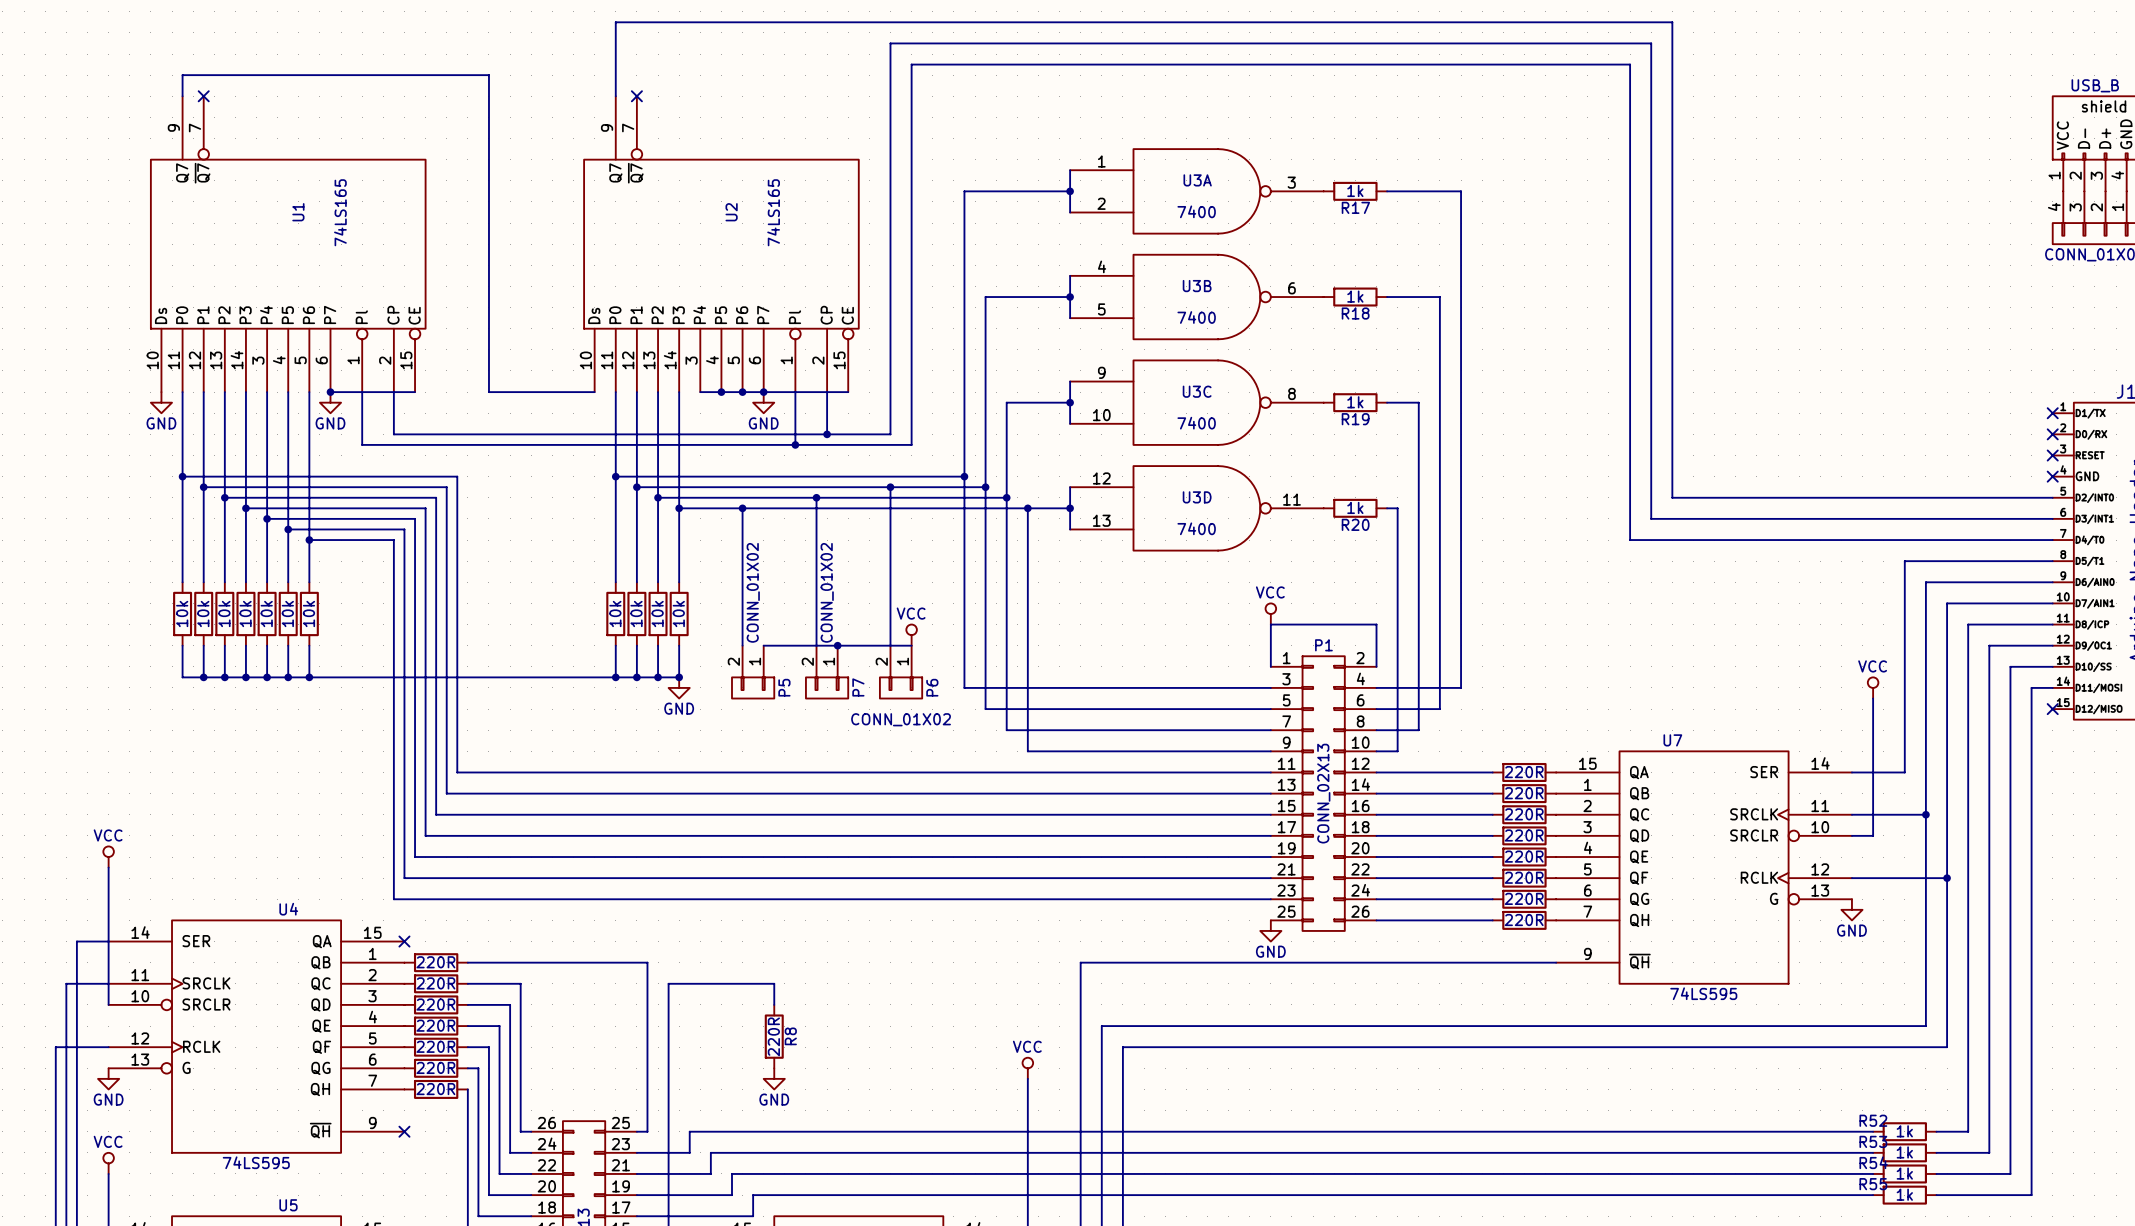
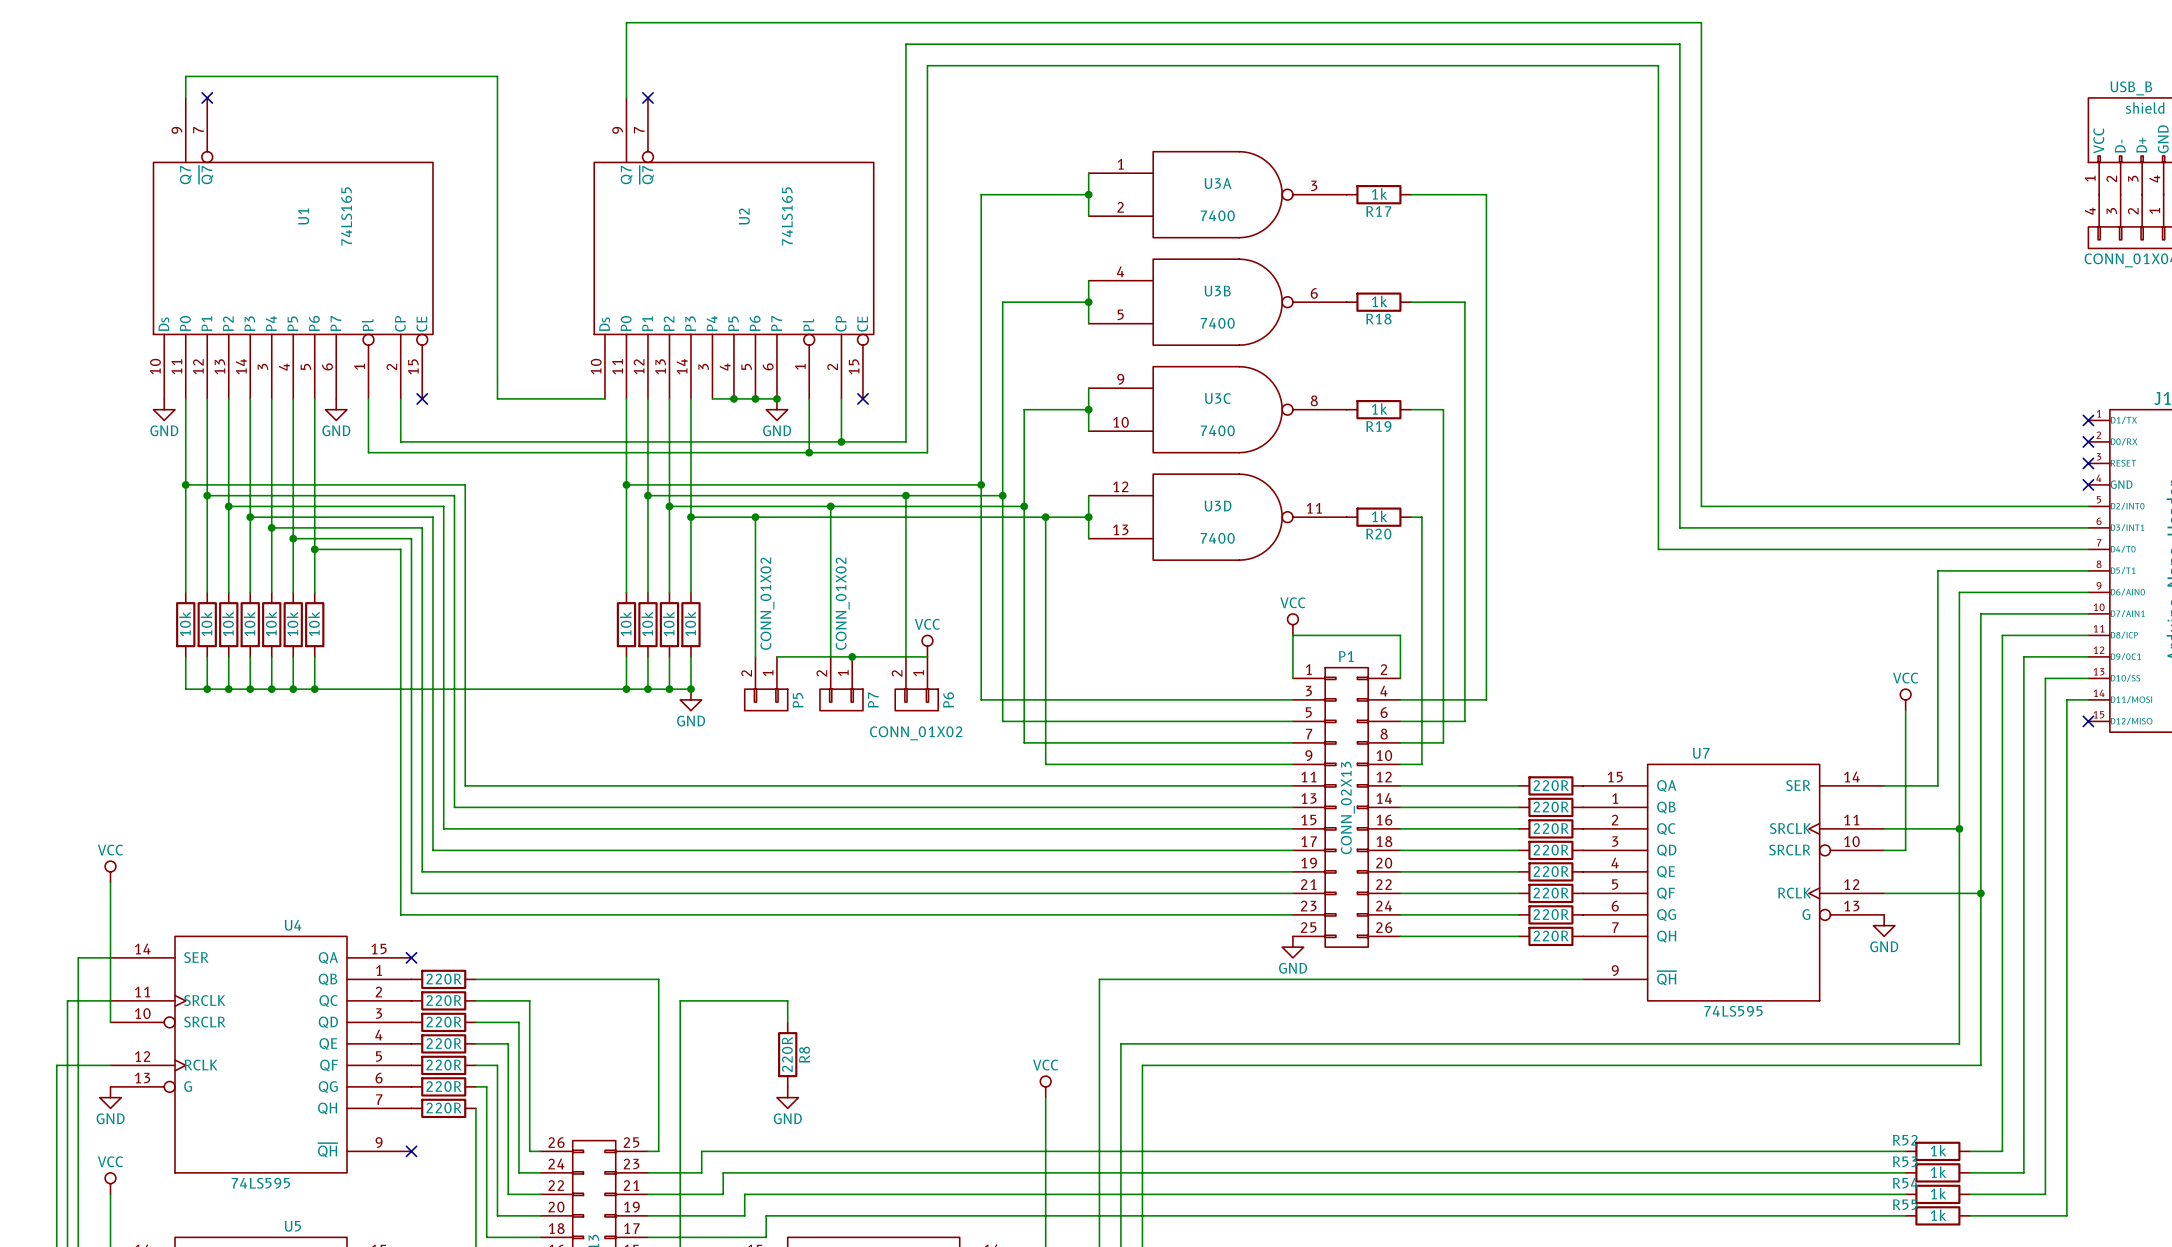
wire: (330, 392) (415, 392) -> none
junction: (330, 392) -> none
no-connect mark: none -> (422, 398)
wire: (763, 392) (848, 392) -> none
no-connect mark: none -> (862, 398)

